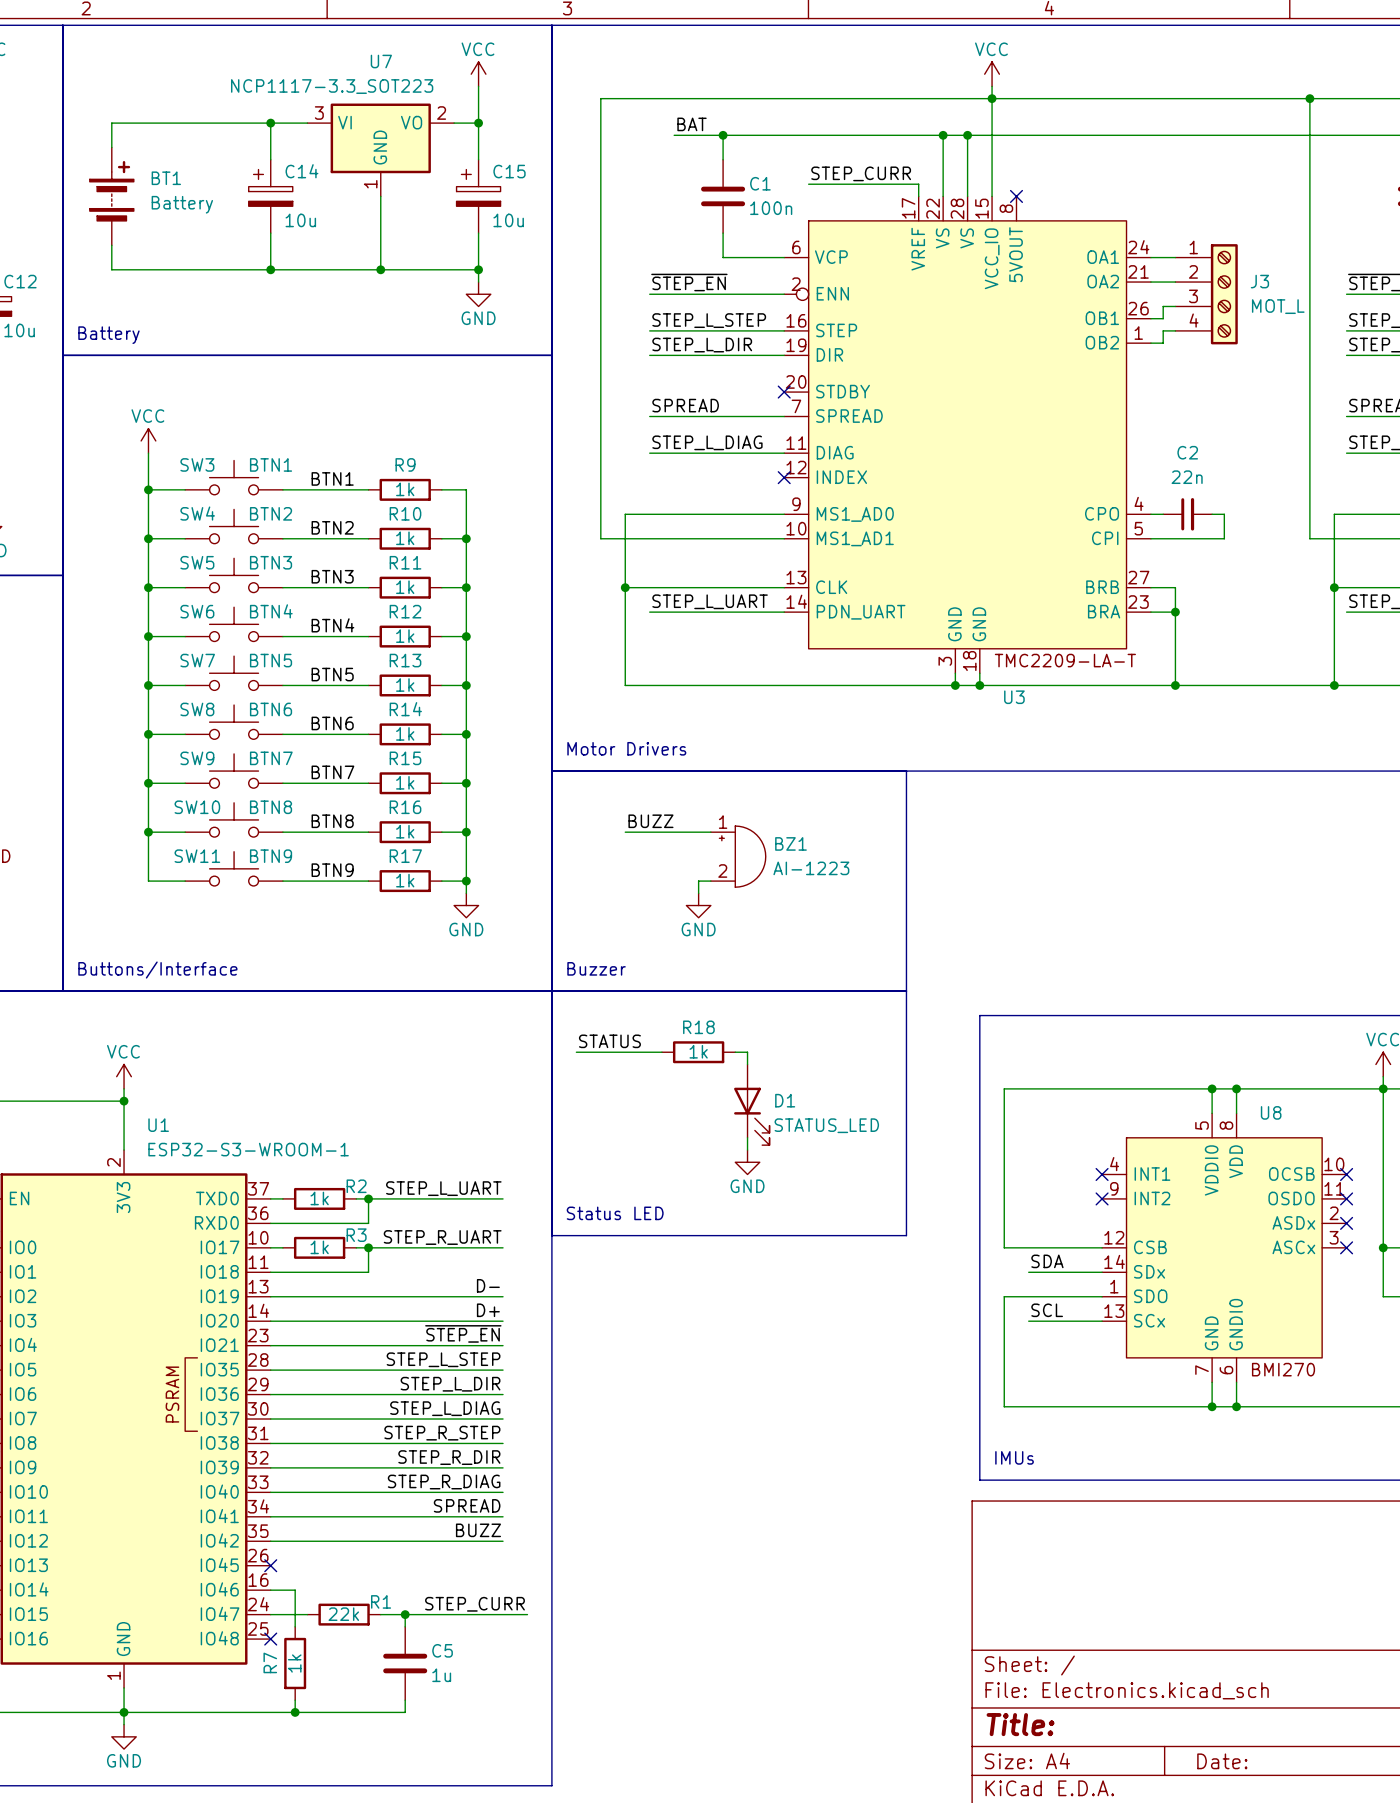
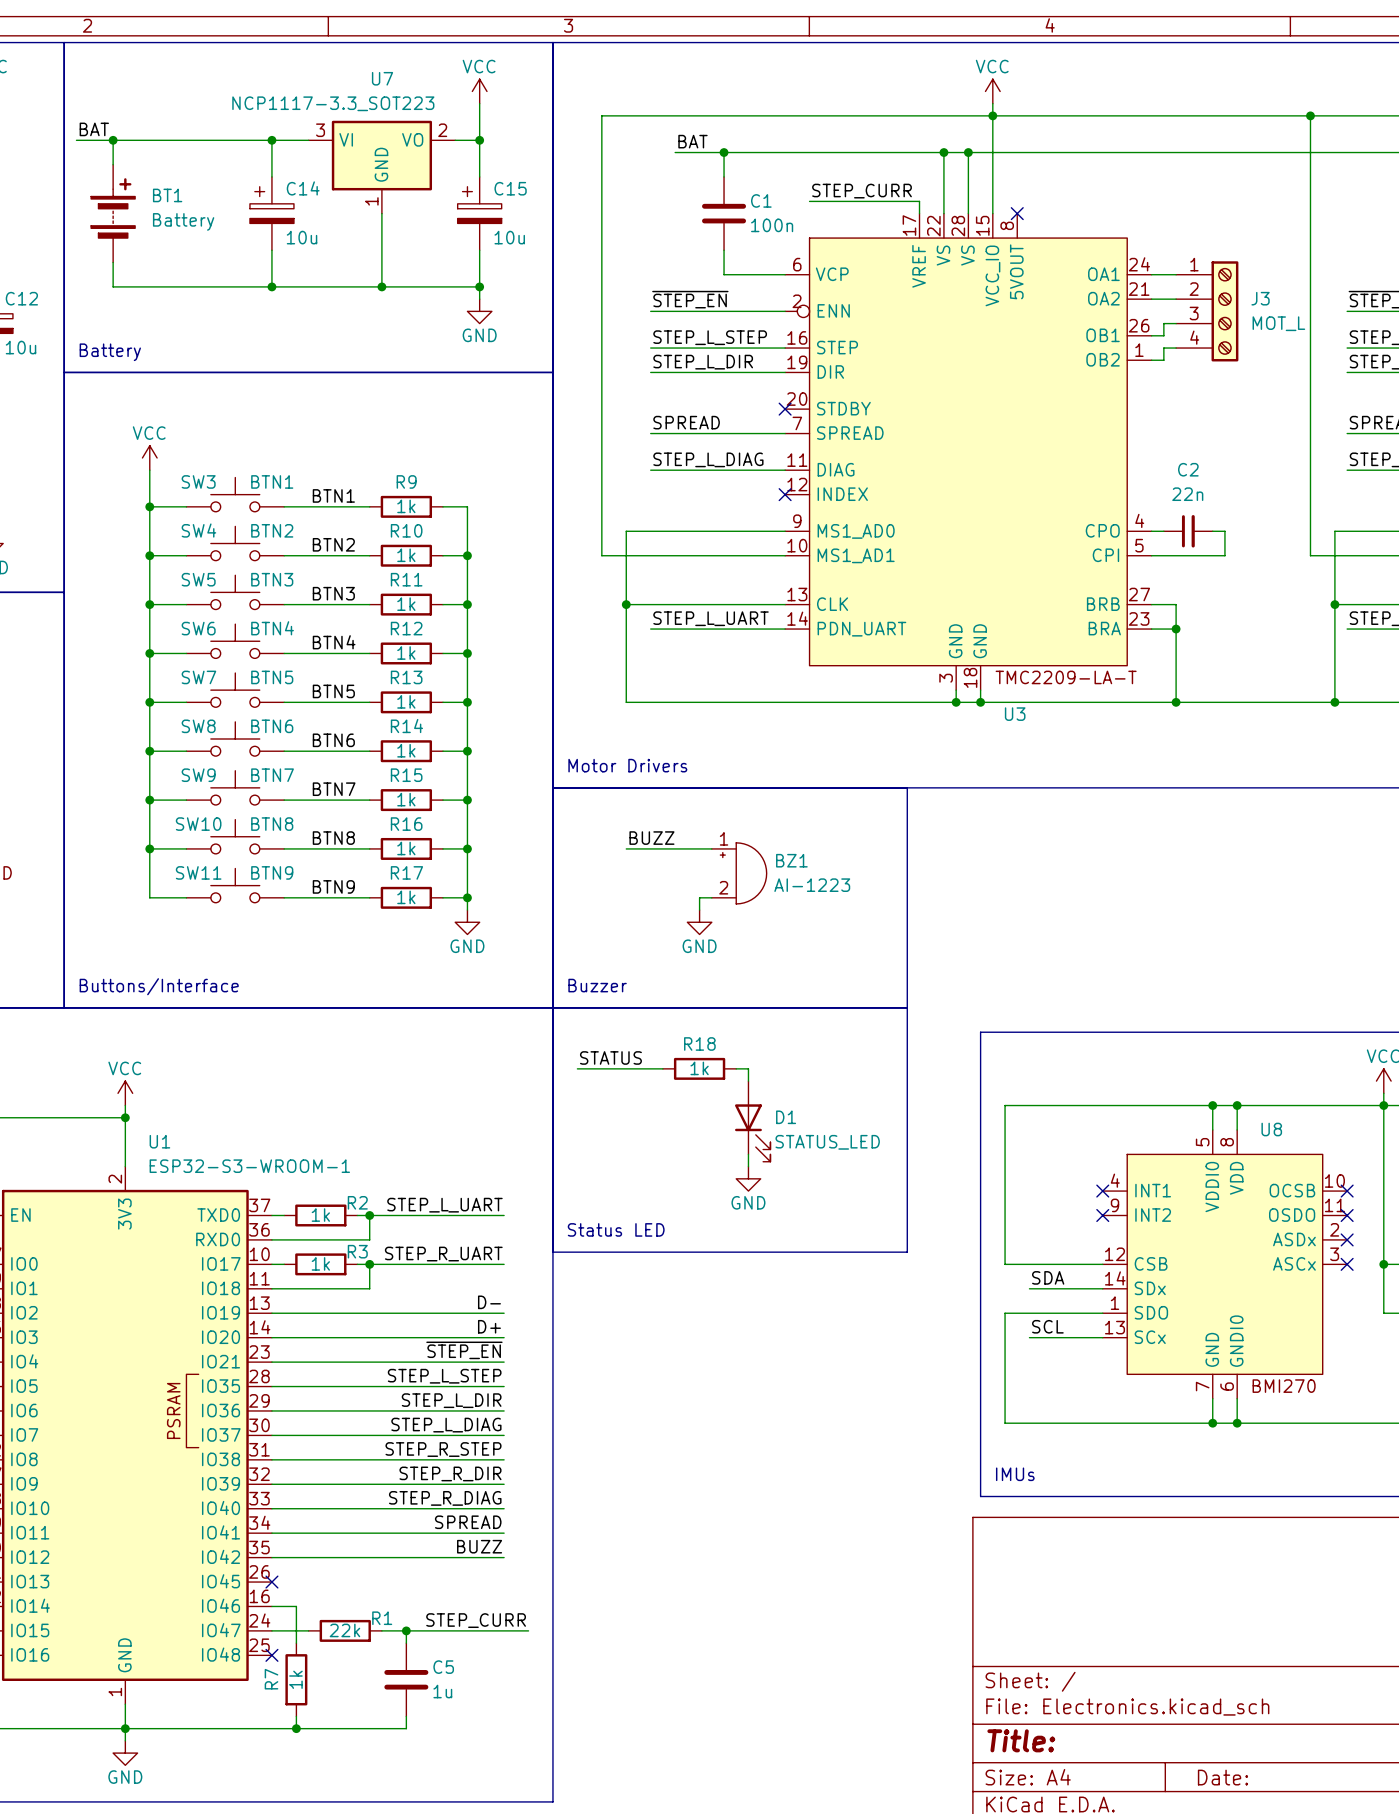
label: none -> BAT (94, 129)
wire: none -> (76, 140) (113, 140)
junction: none -> (113, 140)

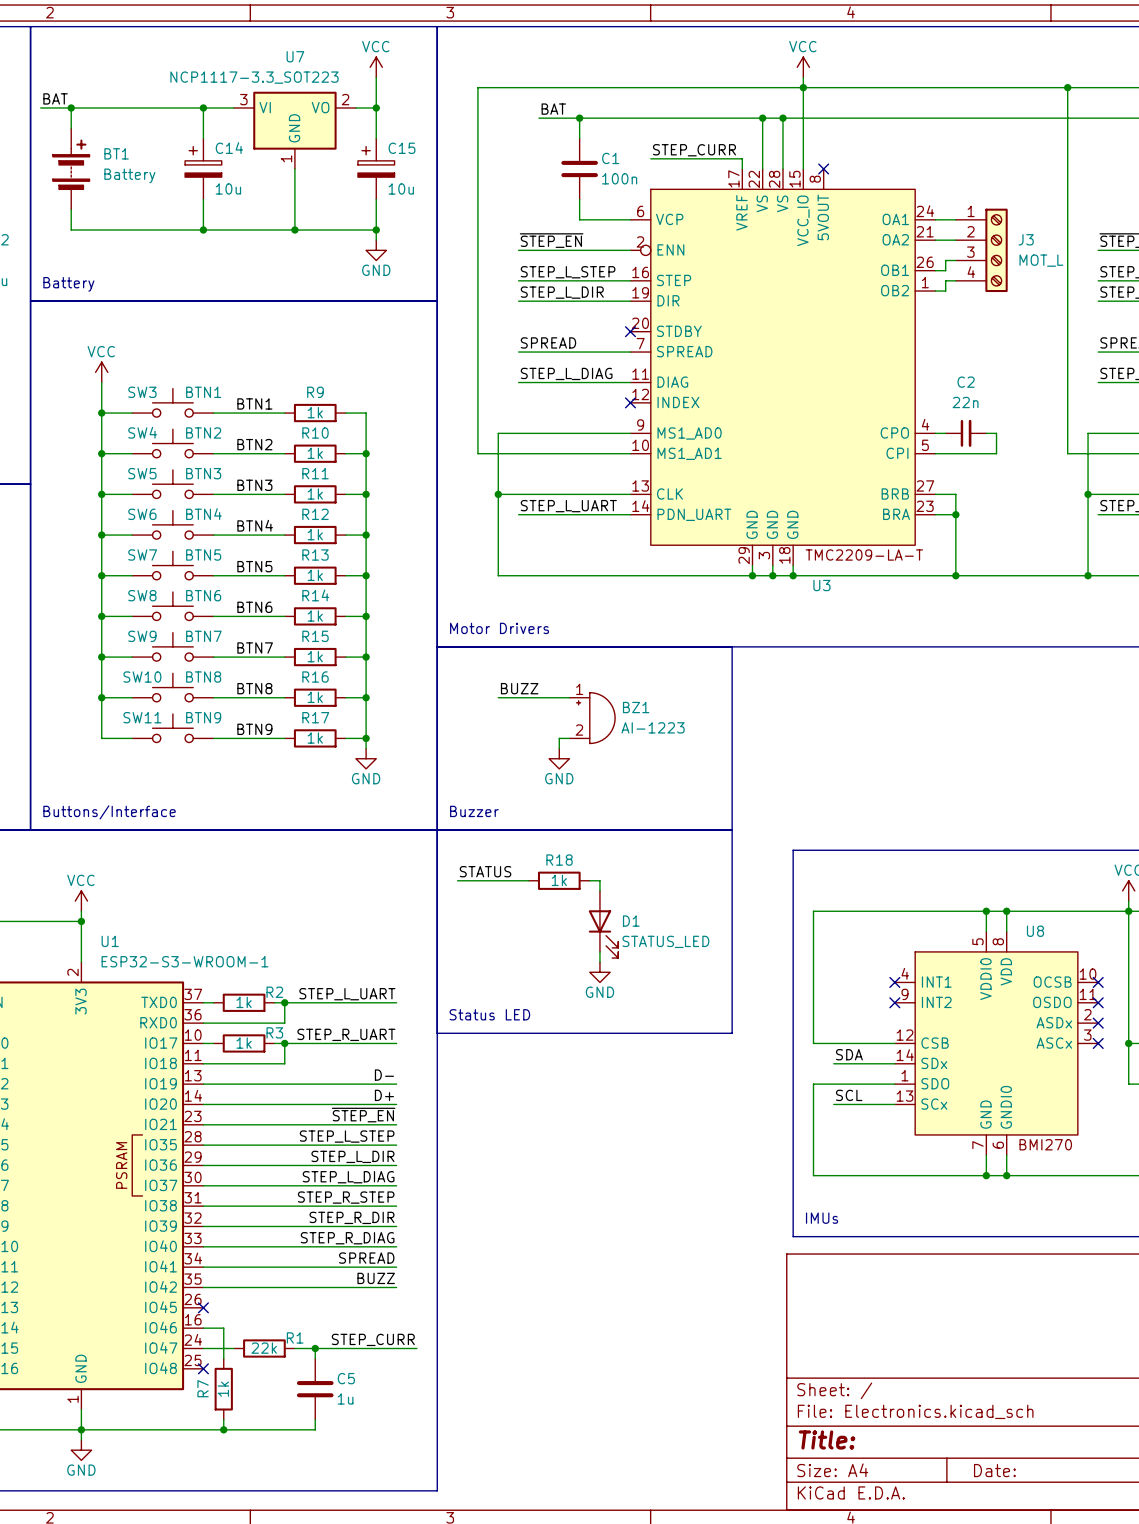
U3 symbol: [785, 213, 1152, 691] -> [630, 168, 936, 566]
wire: none -> (752, 565) (752, 575)
junction: none -> (752, 575)

